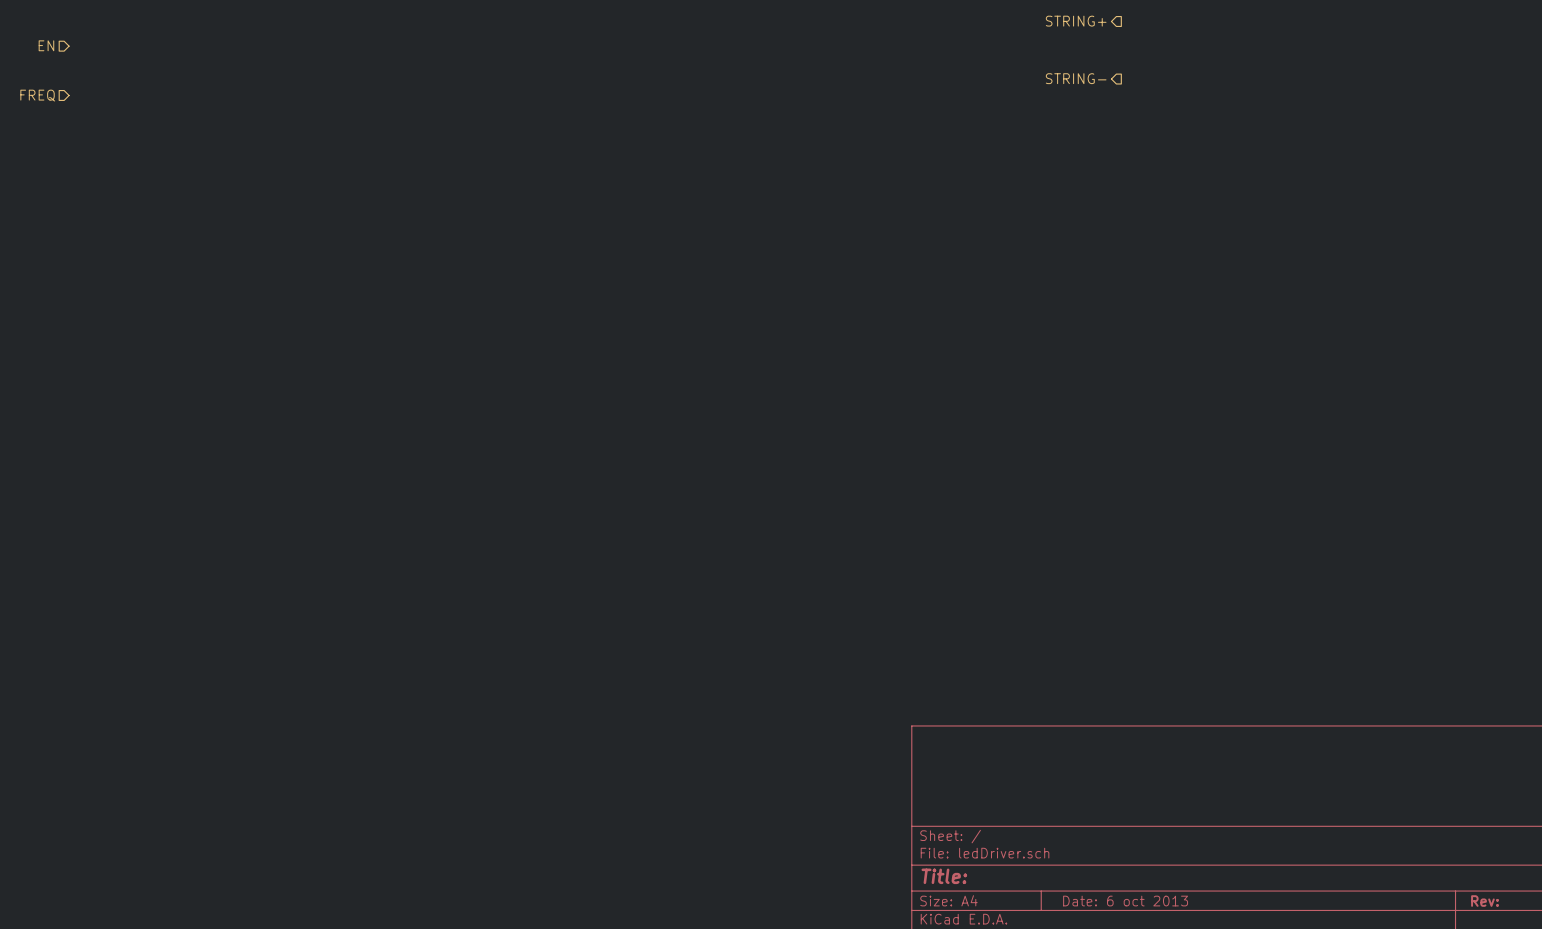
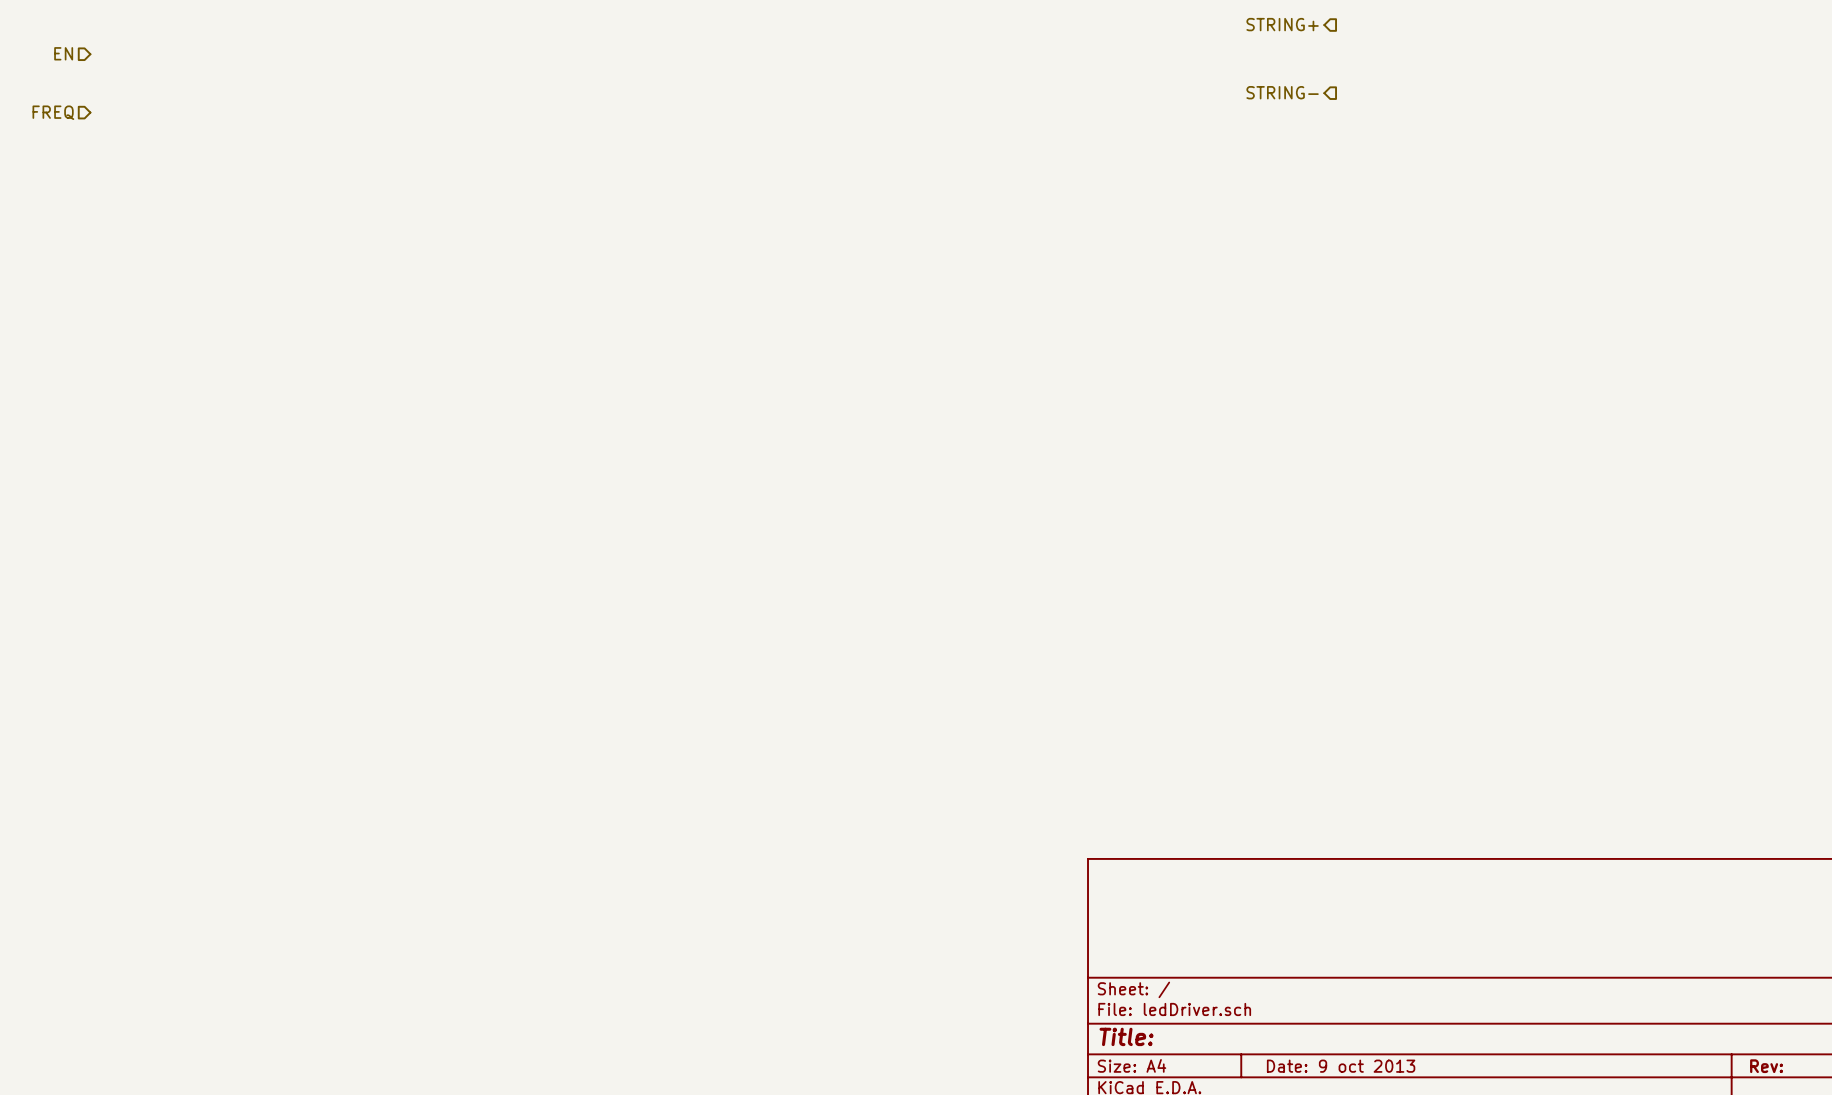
title block: Date: 6 oct 2013 (1125, 901) -> Date: 9 oct 2013 (1341, 1066)

